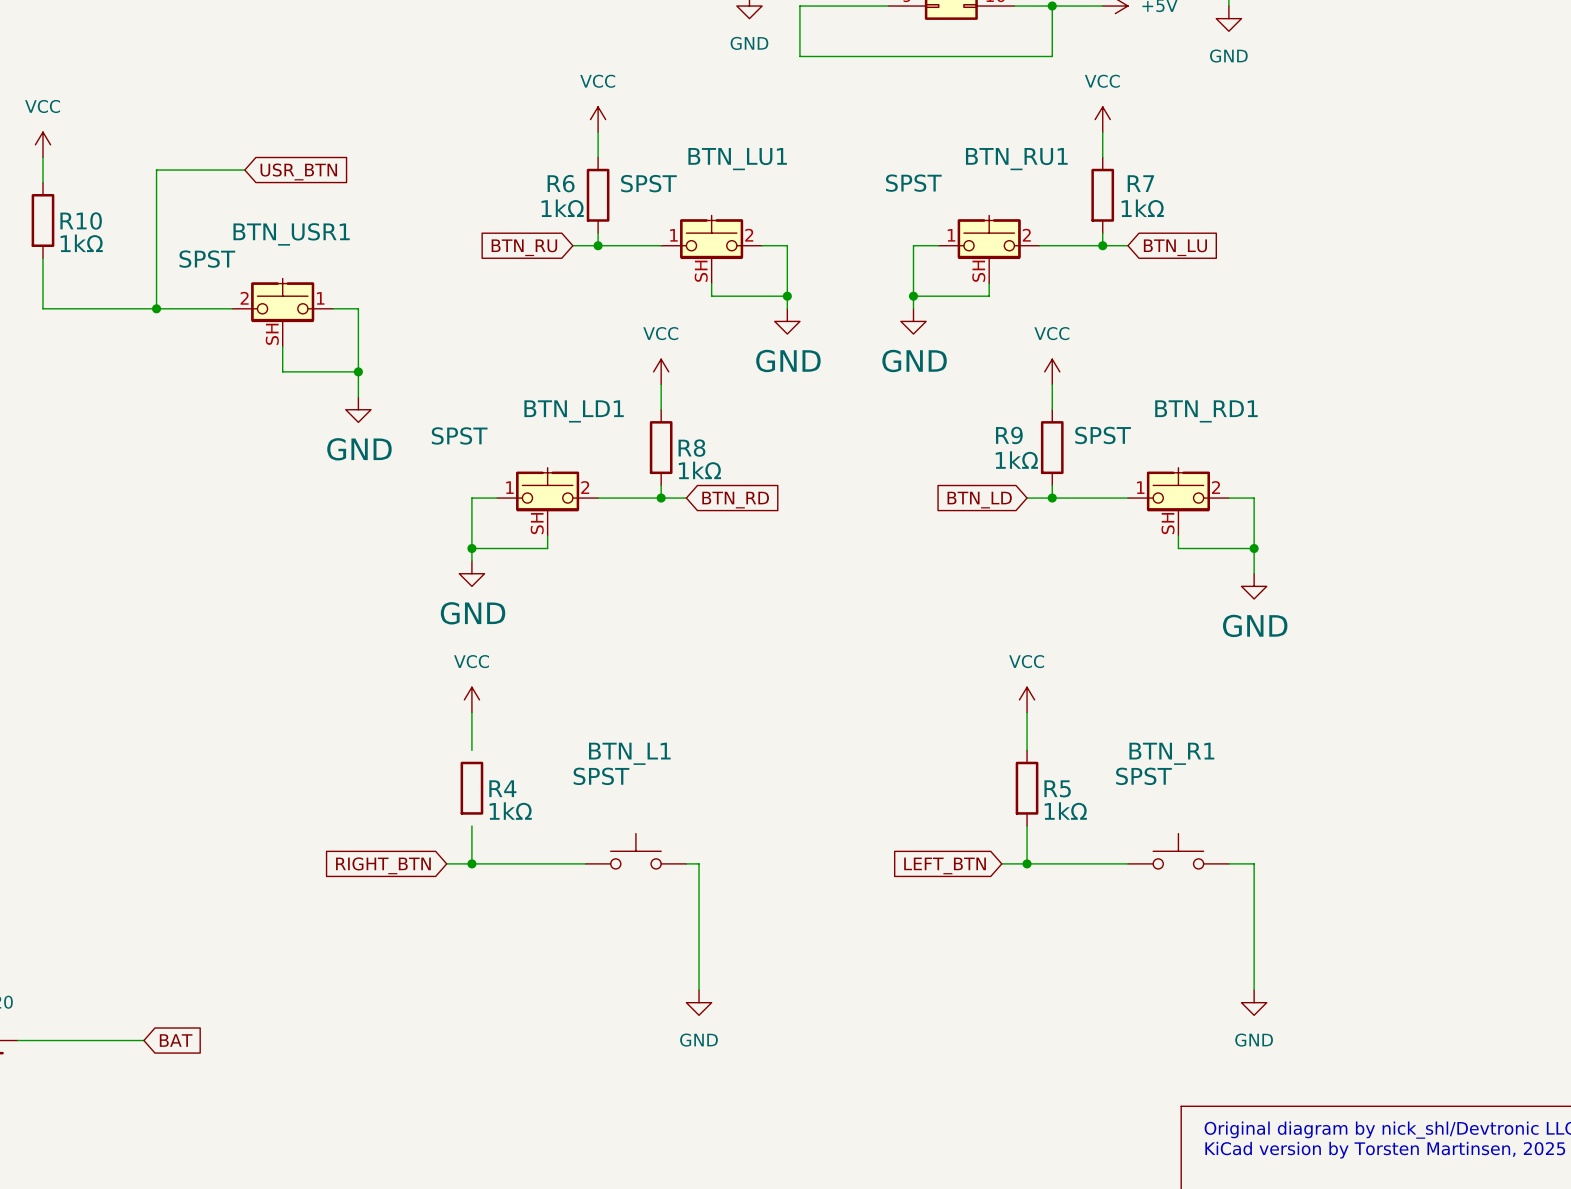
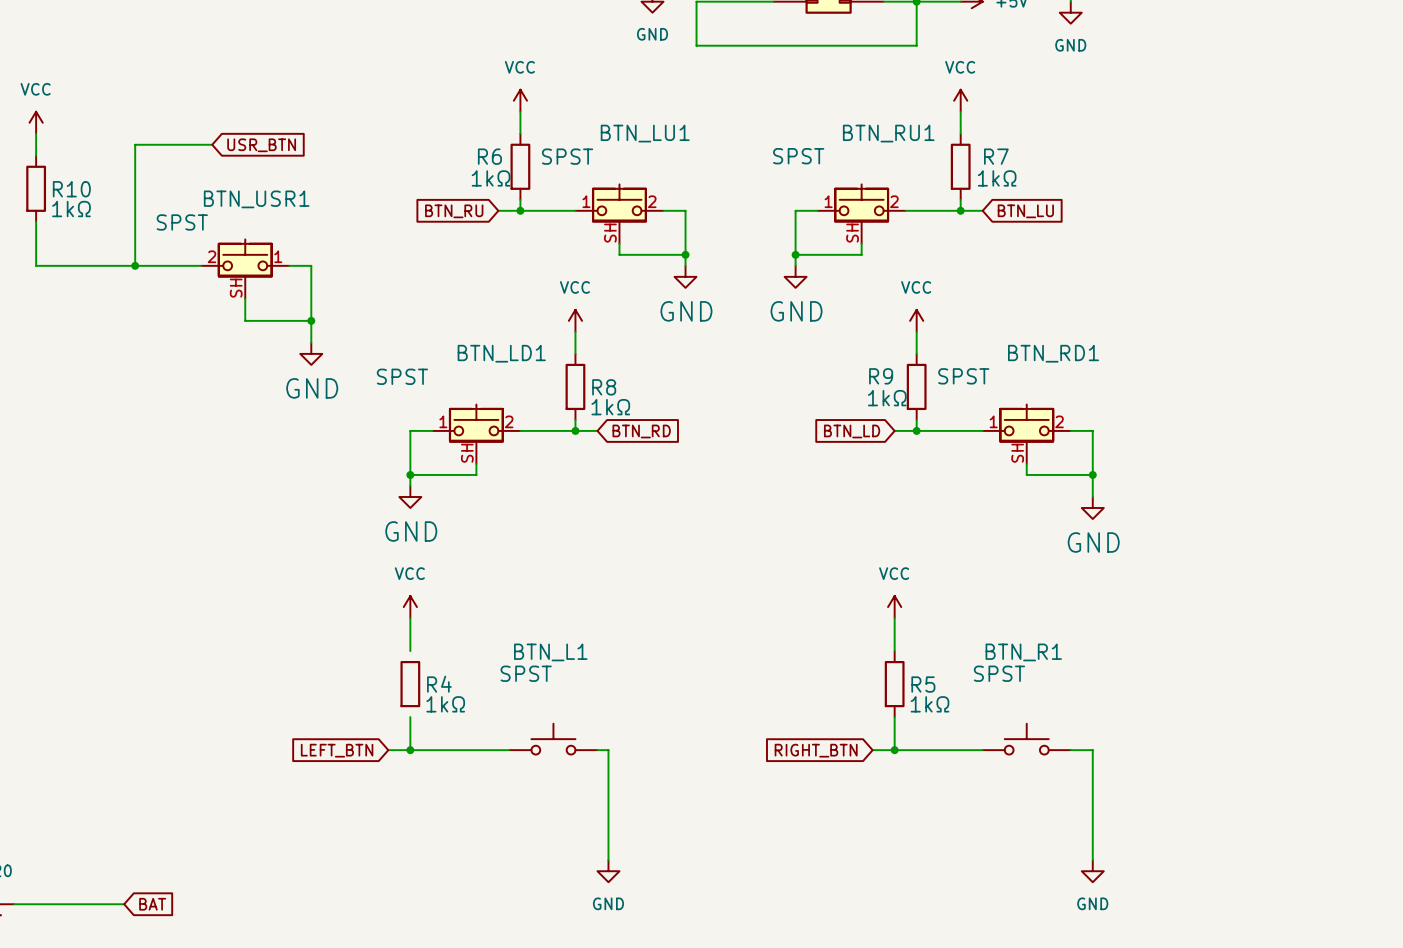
global label: RIGHT_BTN (383, 865) -> LEFT_BTN (337, 750)
global label: LEFT_BTN (945, 865) -> RIGHT_BTN (816, 750)

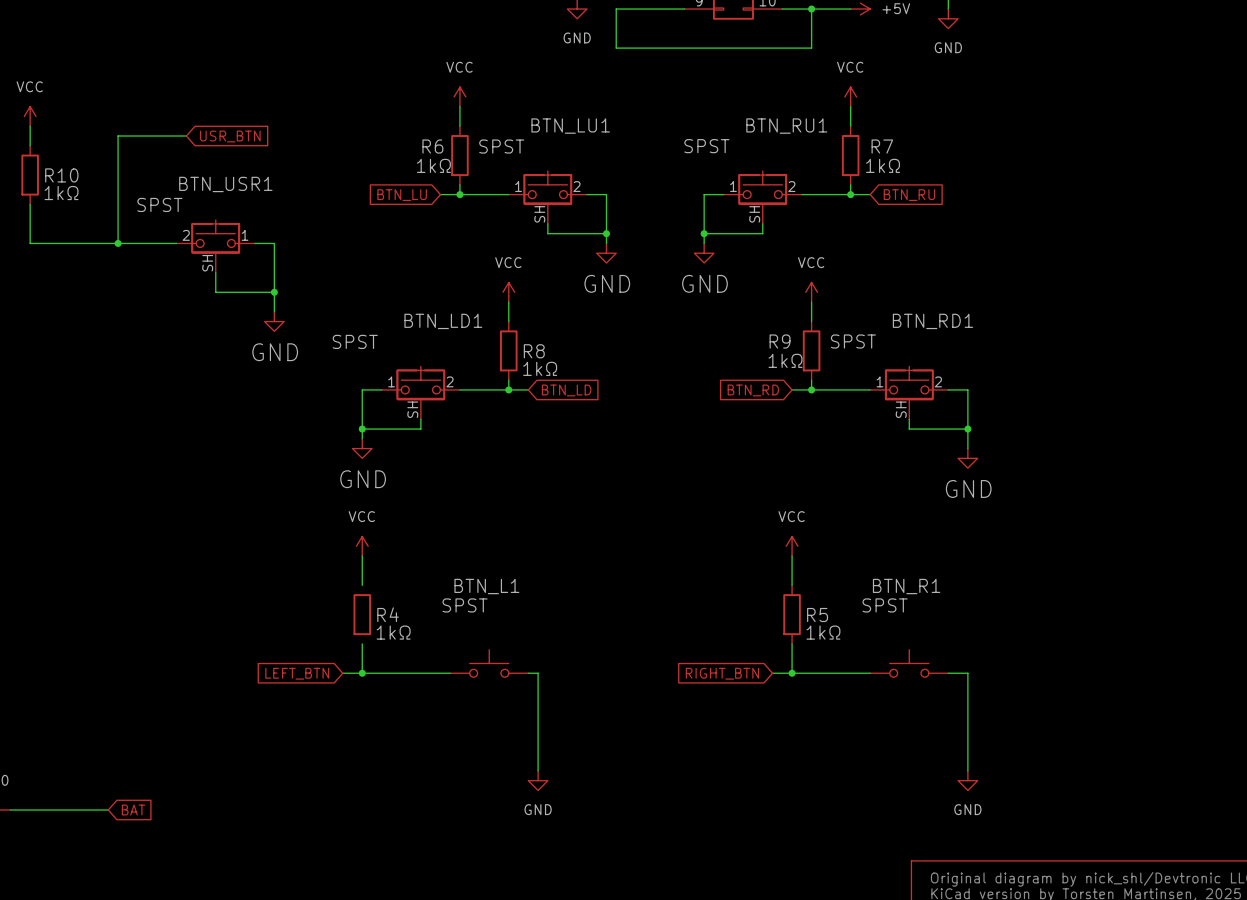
global label: BTN_RU (454, 211) -> BTN_LU (402, 195)
global label: BTN_LU (1025, 211) -> BTN_RU (909, 195)
global label: BTN_RD (641, 431) -> BTN_LD (566, 390)
global label: BTN_LD (852, 431) -> BTN_RD (753, 390)

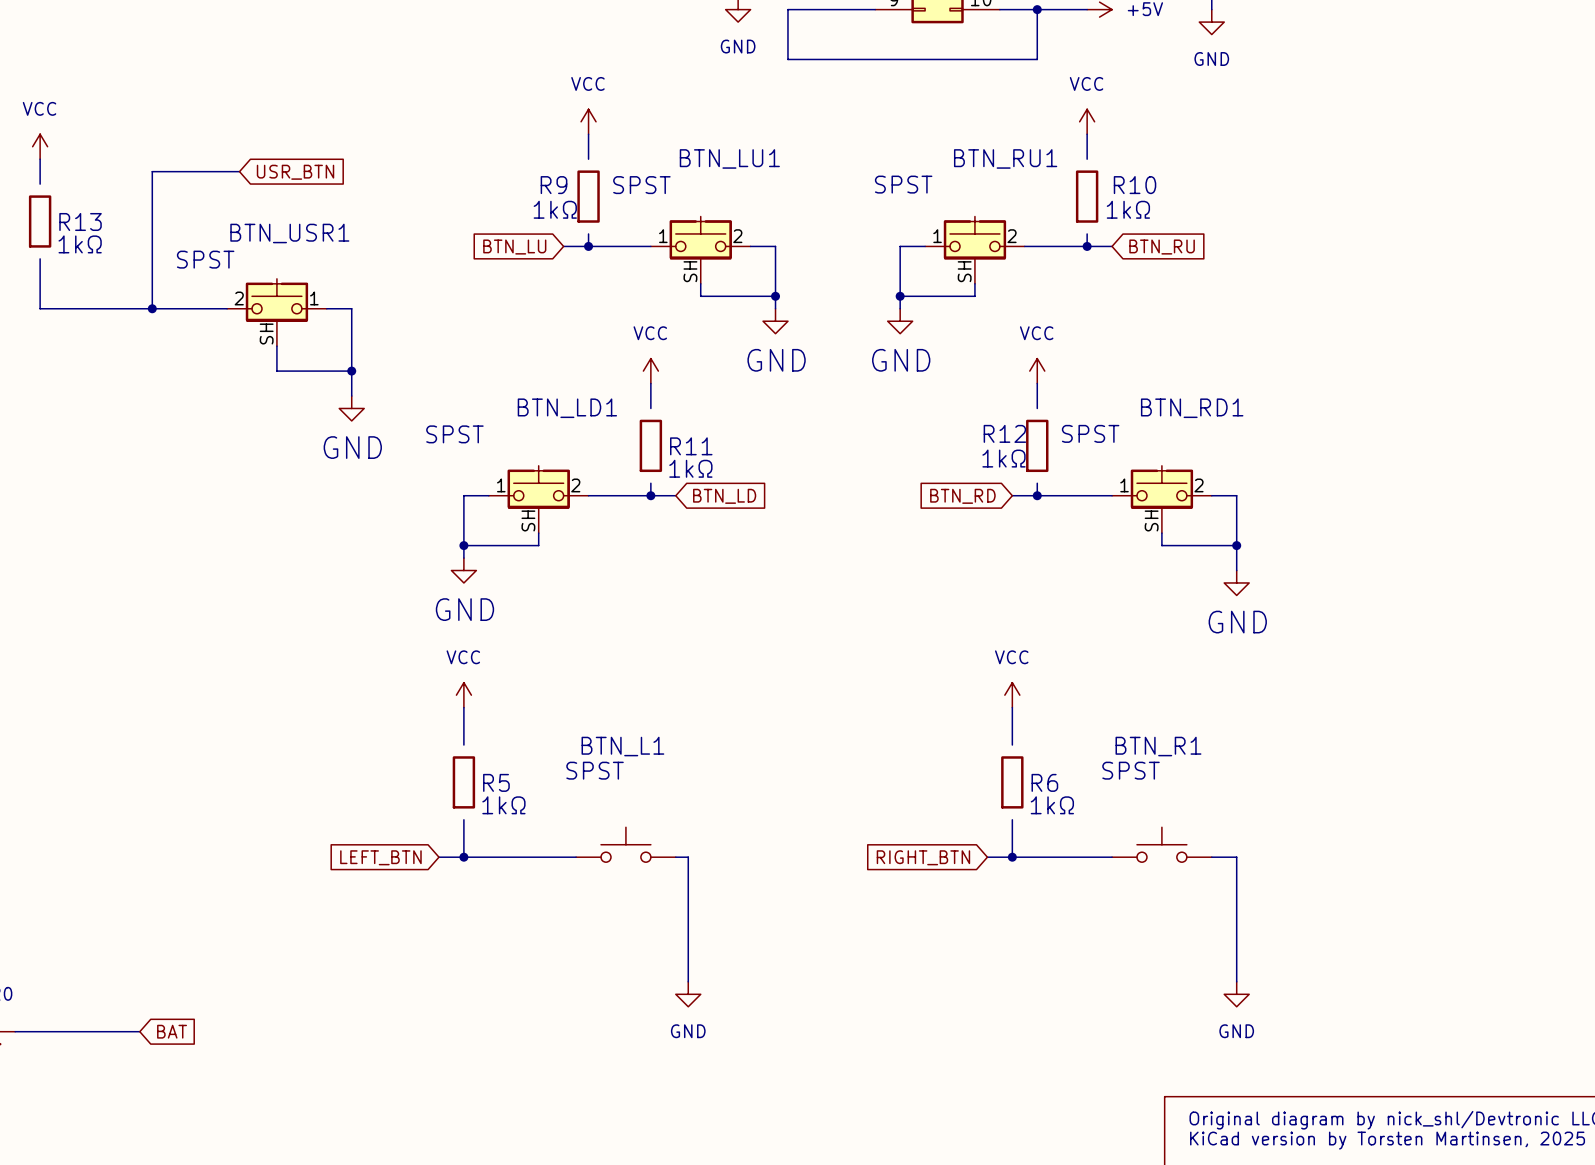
R6 symbol: [451, 126, 469, 185] -> [1001, 756, 1024, 809]
R10 symbol: [21, 145, 39, 205] -> [1075, 170, 1099, 223]
R6 name position: R6 (432, 146) -> R6 (1044, 782)
R7: 1kΩ (850, 155) -> none
R13: none -> 1kΩ (40, 221)
R9 symbol: [802, 321, 821, 381] -> [577, 170, 600, 223]
R8: 1kΩ (508, 350) -> none
R11: none -> 1kΩ (650, 445)
R12: none -> 1kΩ (1037, 445)
R4 name: R4 (388, 614) -> R5 (496, 782)
R5: 1kΩ (792, 614) -> none

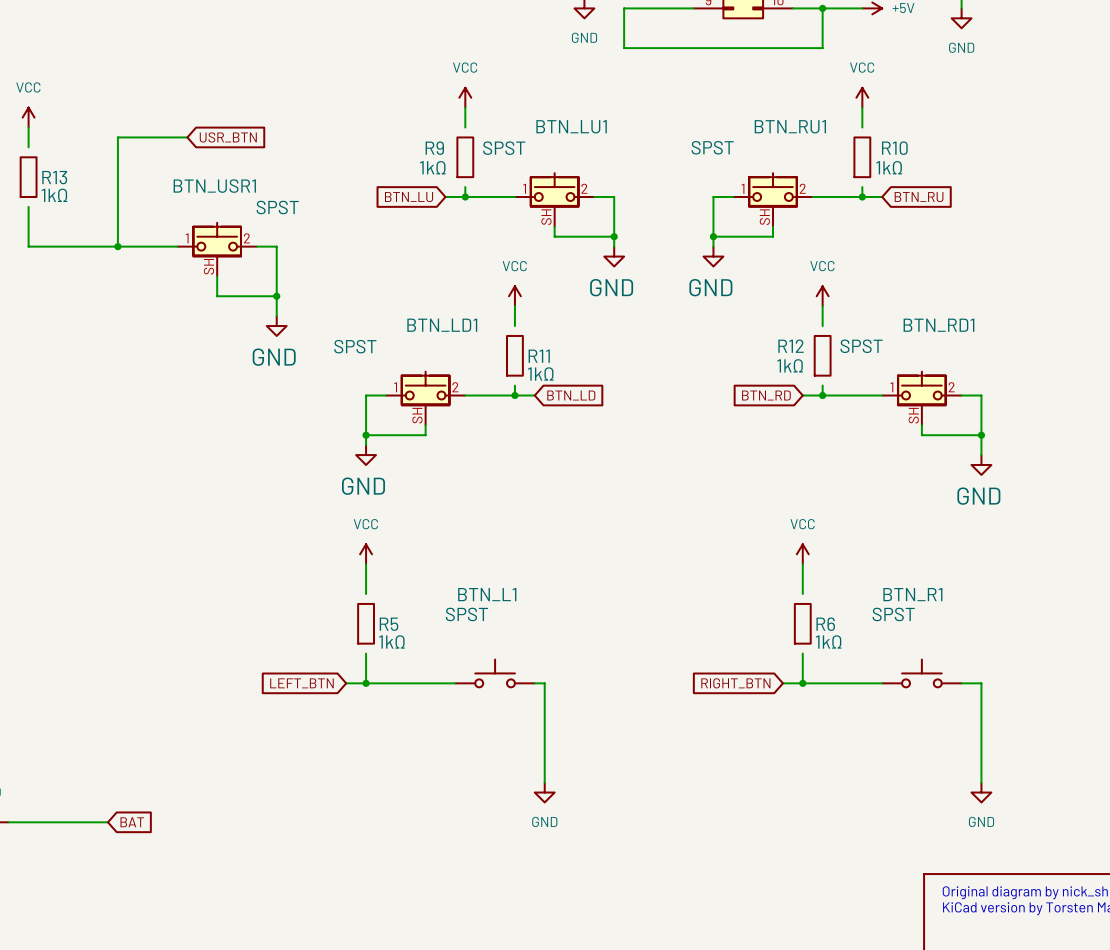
BTN_USR1 flip: as is (276, 300) -> left-right (217, 239)

